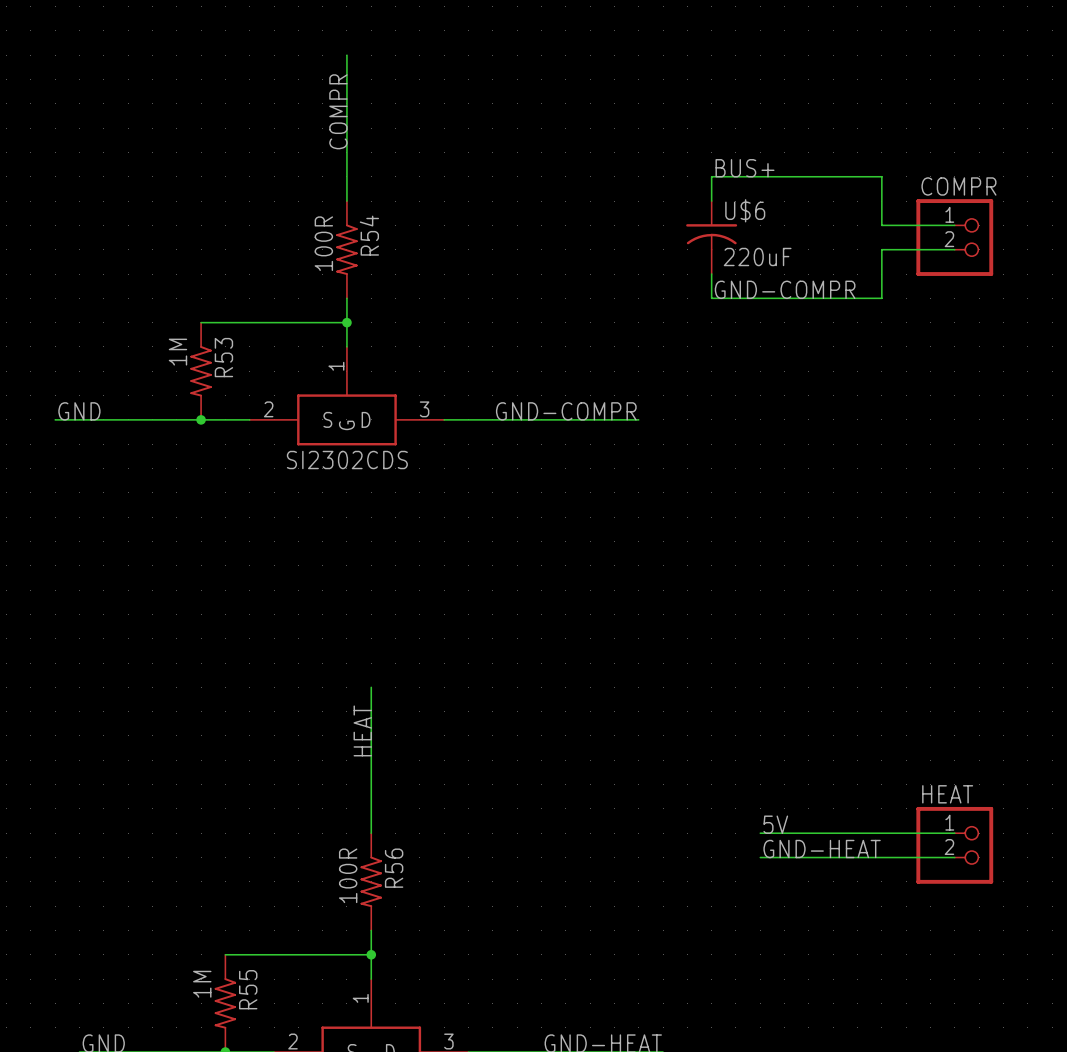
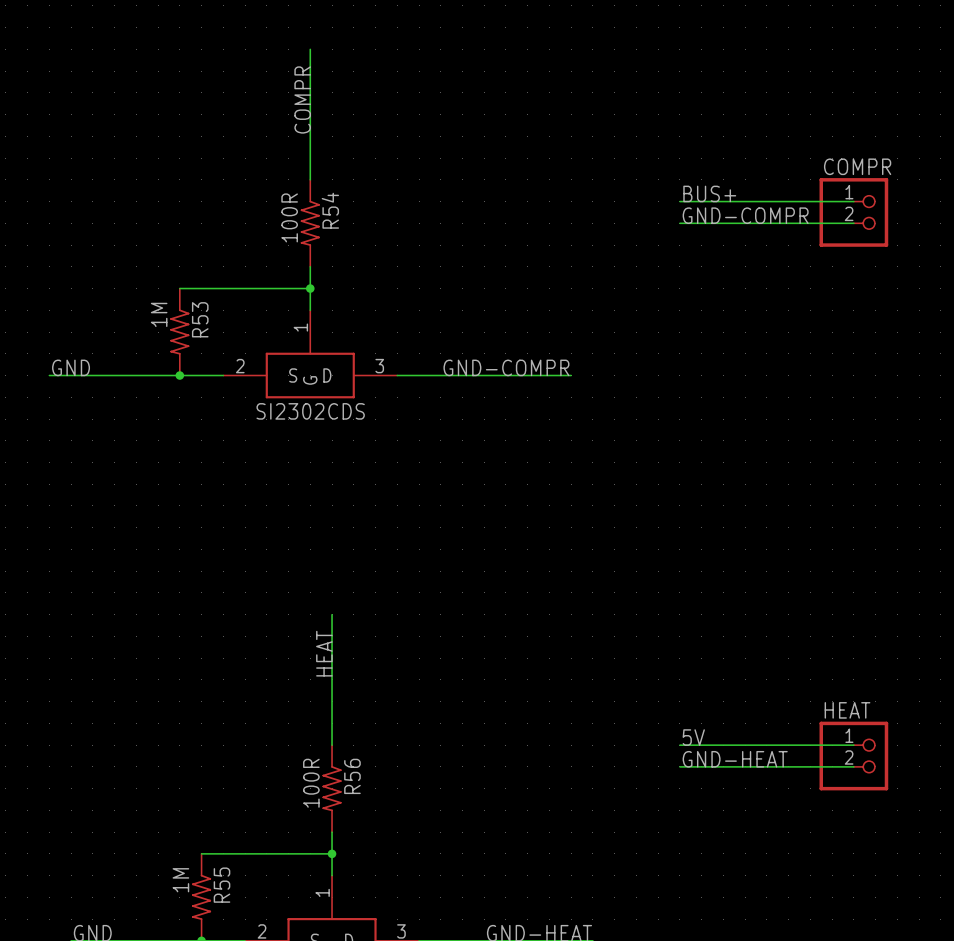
label position: BUS+ (745, 168) -> BUS+ (709, 193)
wire: (711, 201) (711, 176) (881, 176) (881, 225) -> (679, 201) (788, 201)
U$6: 220uF (711, 237) -> none
wire: (881, 249) (881, 298) (711, 298) (711, 274) -> (788, 223) (679, 223)
label position: GND-COMPR (785, 289) -> GND-COMPR (745, 215)

